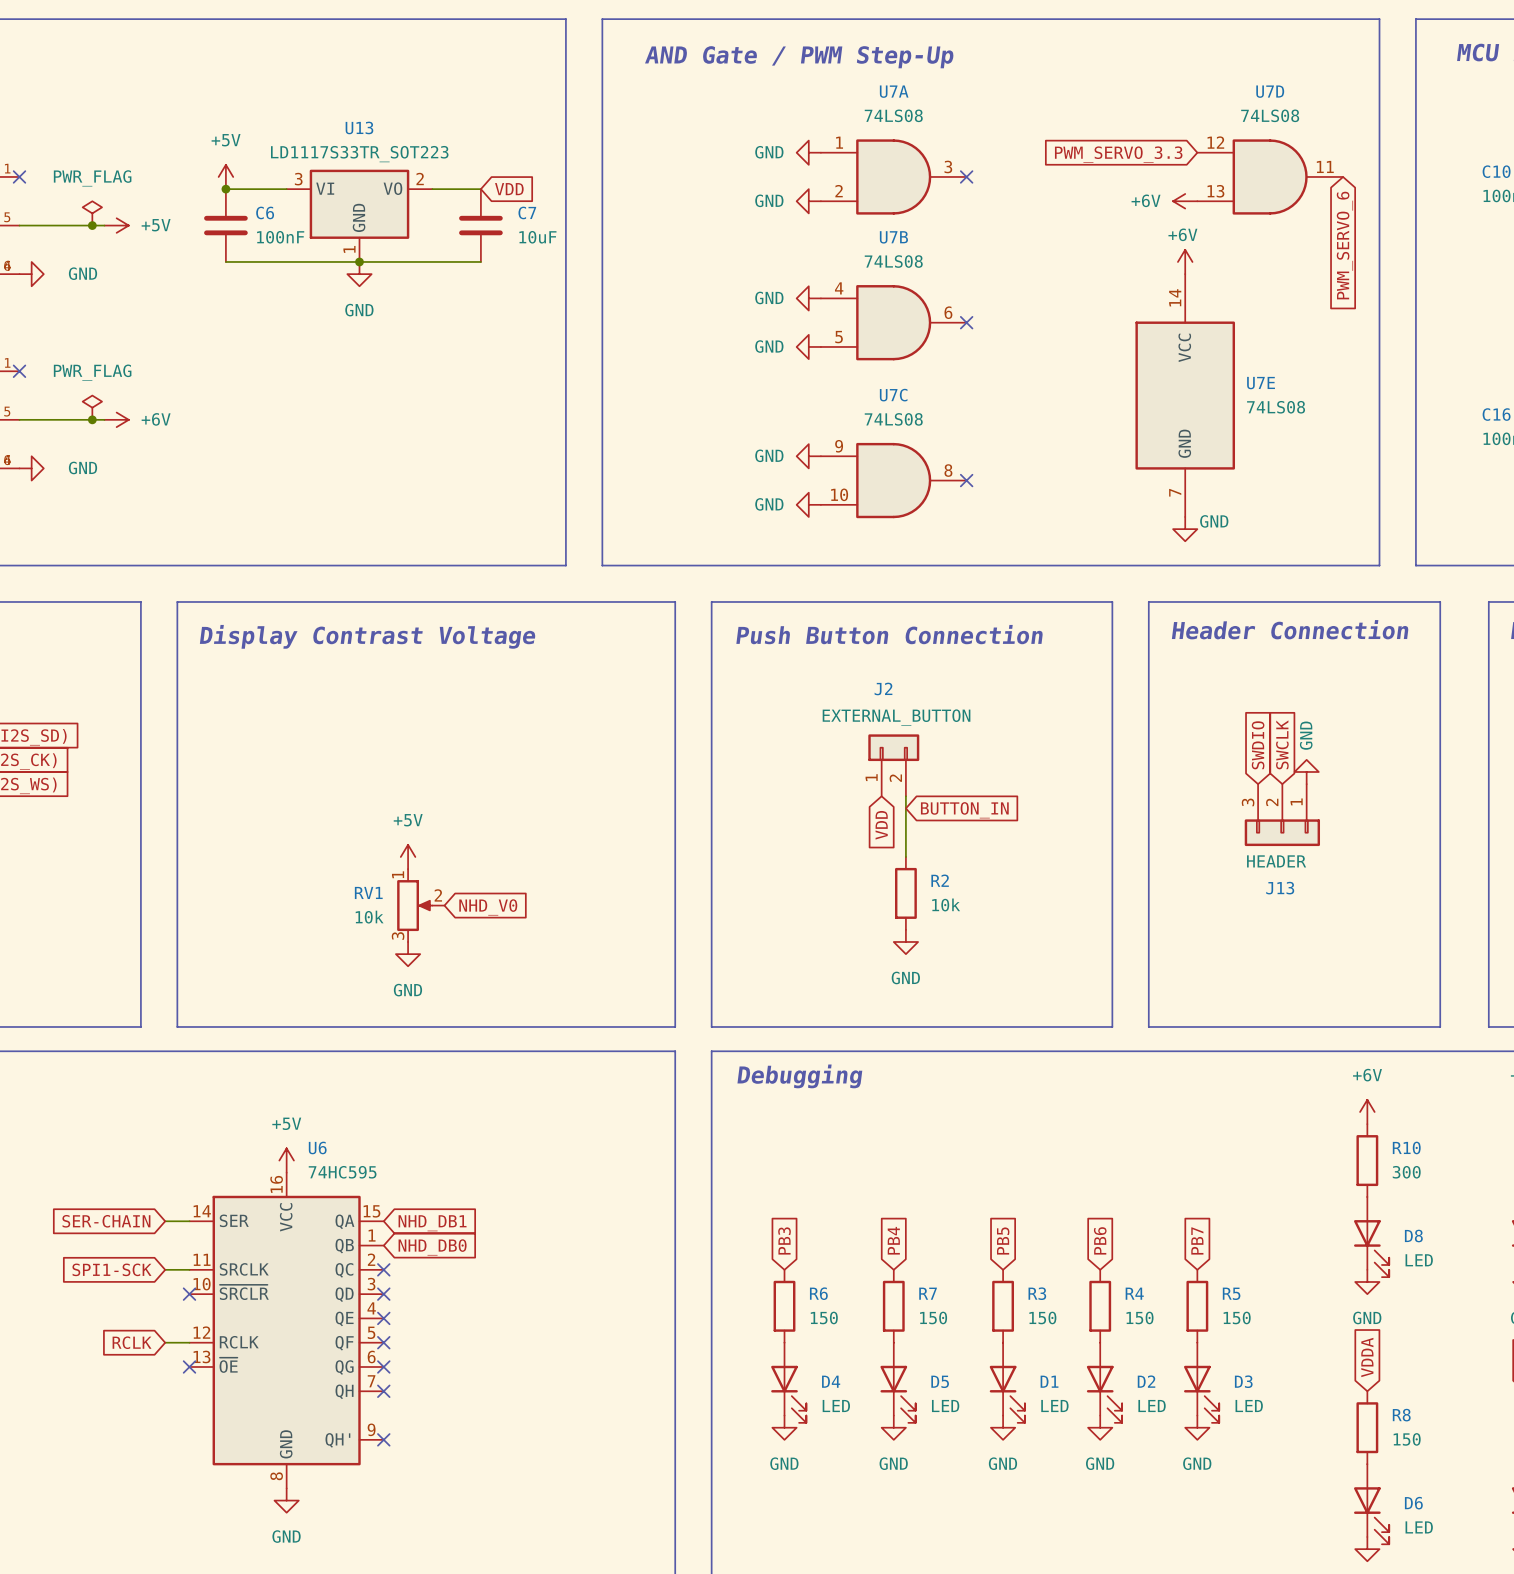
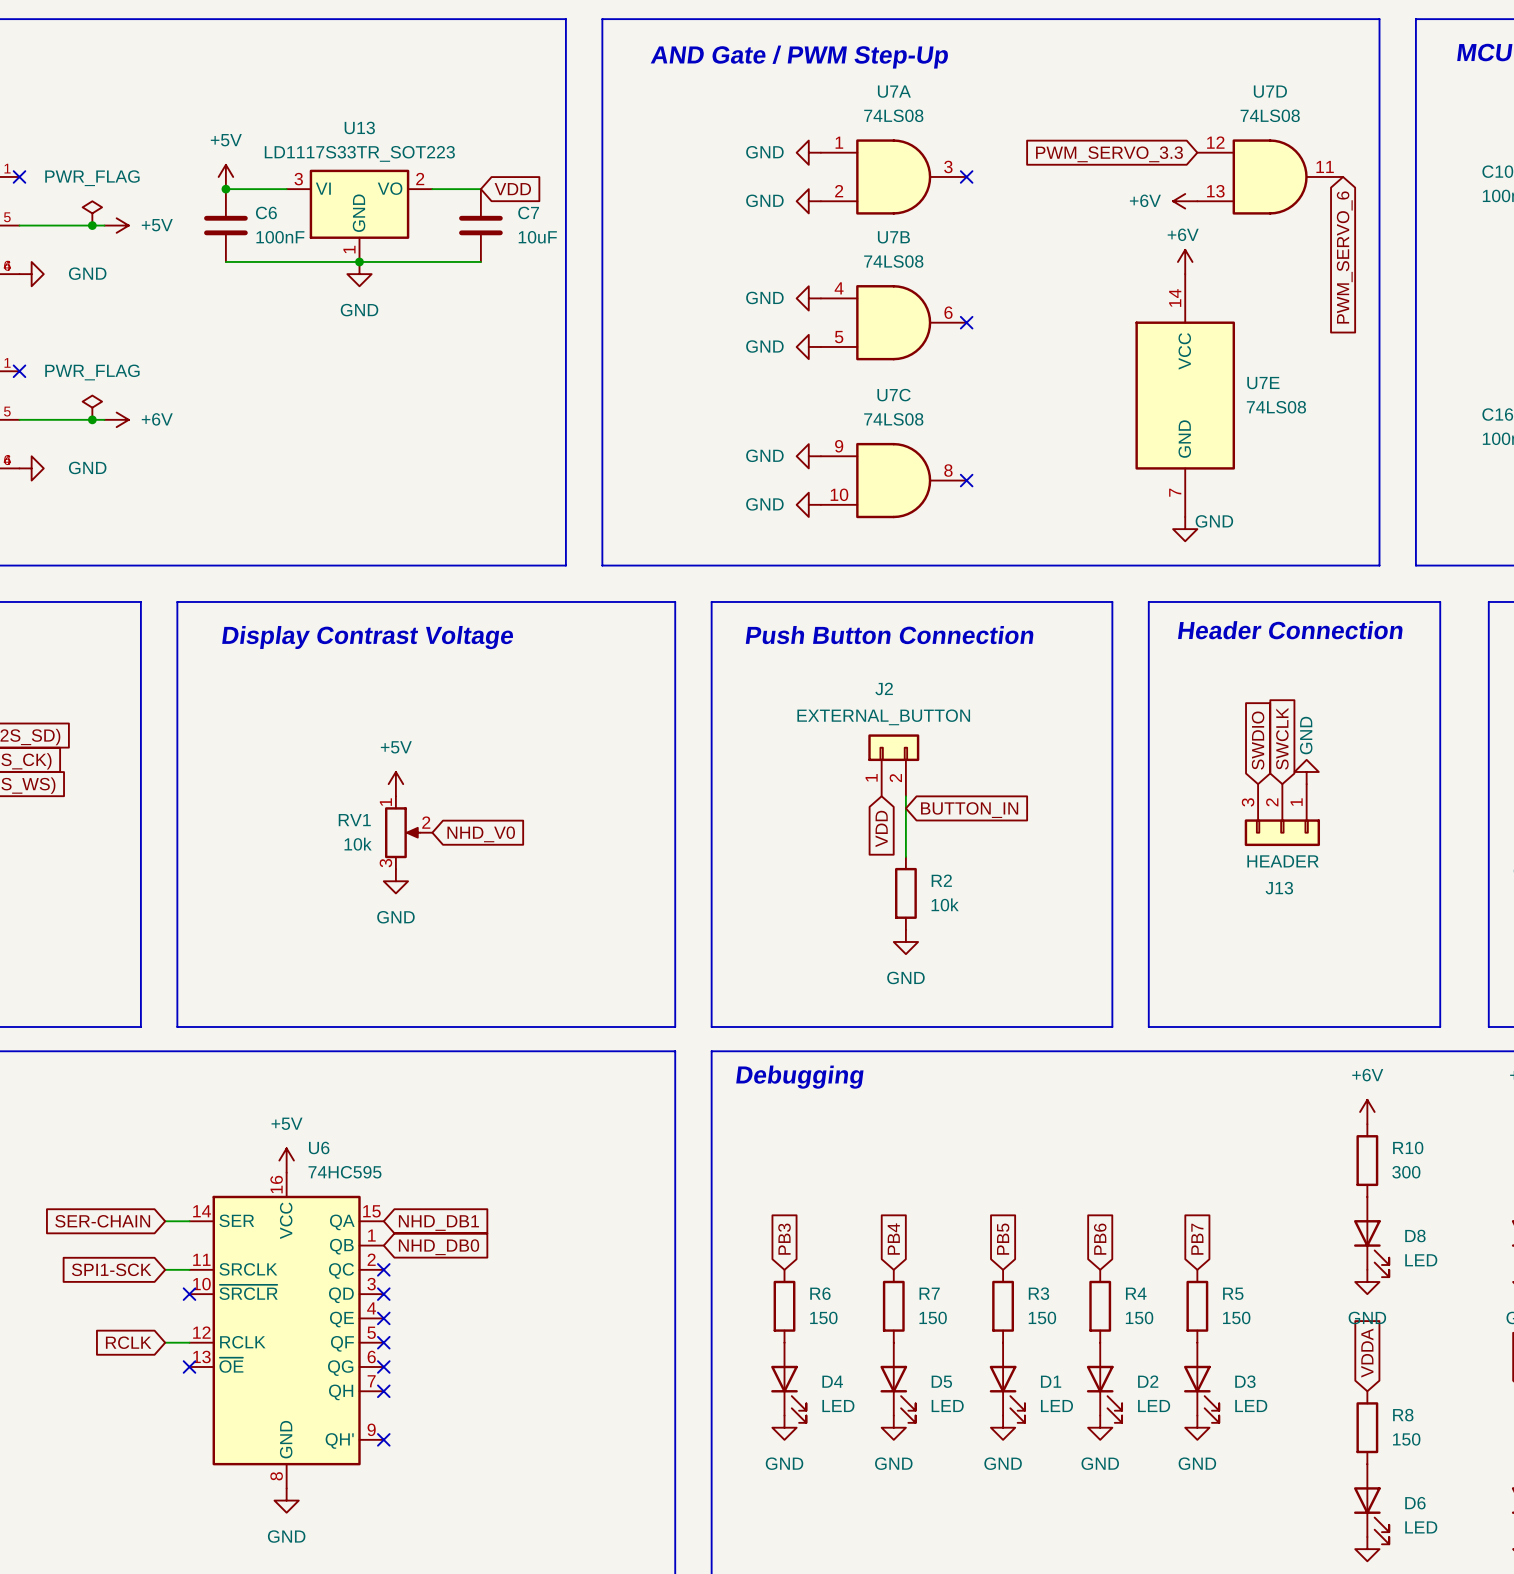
power symbol position: +5V (408, 856) -> +5V (395, 784)
RV1 position: (420, 905) -> (408, 832)
global label position: NHD_V0 (488, 907) -> NHD_V0 (481, 834)
power symbol position: GND (408, 954) -> GND (395, 881)

